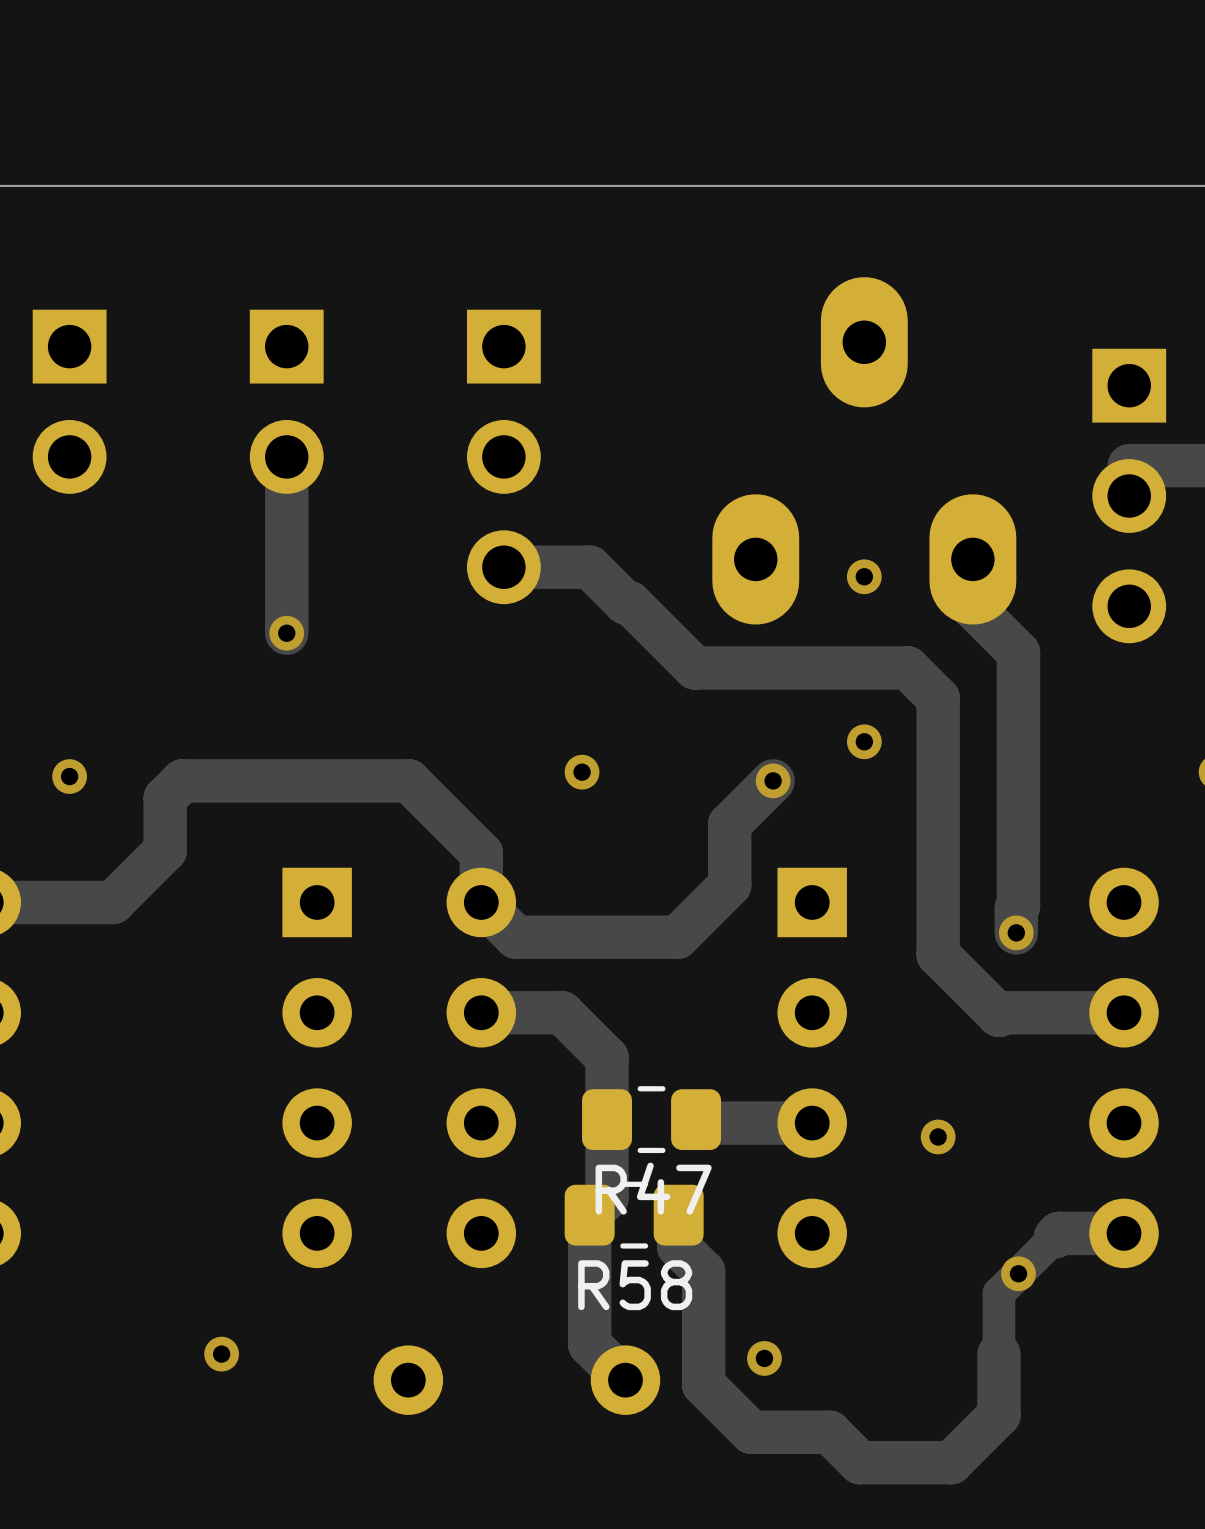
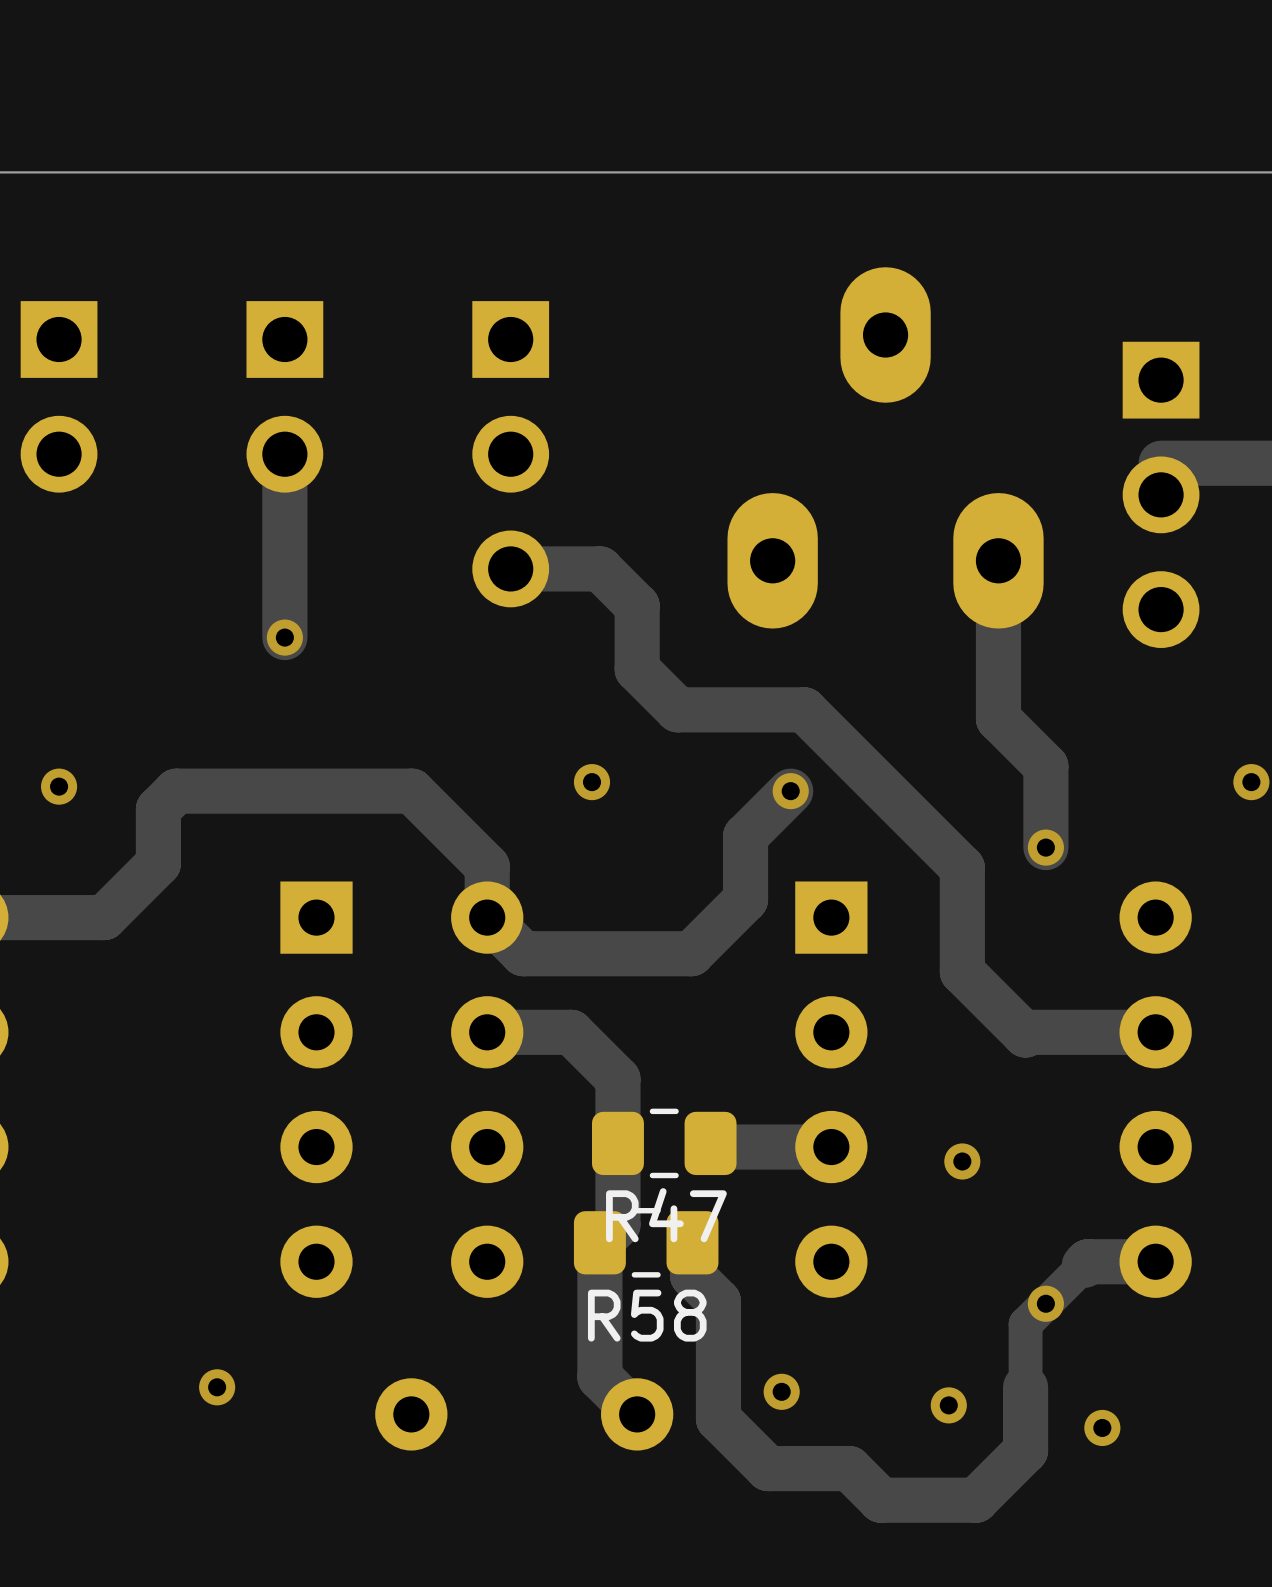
via: (864, 576) -> none
track: (625, 602) (629, 602) (694, 667) (907, 667) (938, 698) (938, 854) -> (637, 605) (637, 669) (677, 709) (804, 709) (962, 867)
track: (972, 607) (1018, 652) (1018, 757) -> (998, 610) (998, 718) (1045, 766)
via: (864, 741) -> none
track: (1018, 835) (1018, 906) (1016, 908) (1016, 932) -> none
via: none -> (1045, 847)
via: (1016, 932) -> none
via: none -> (948, 1405)
via: none -> (1102, 1427)

